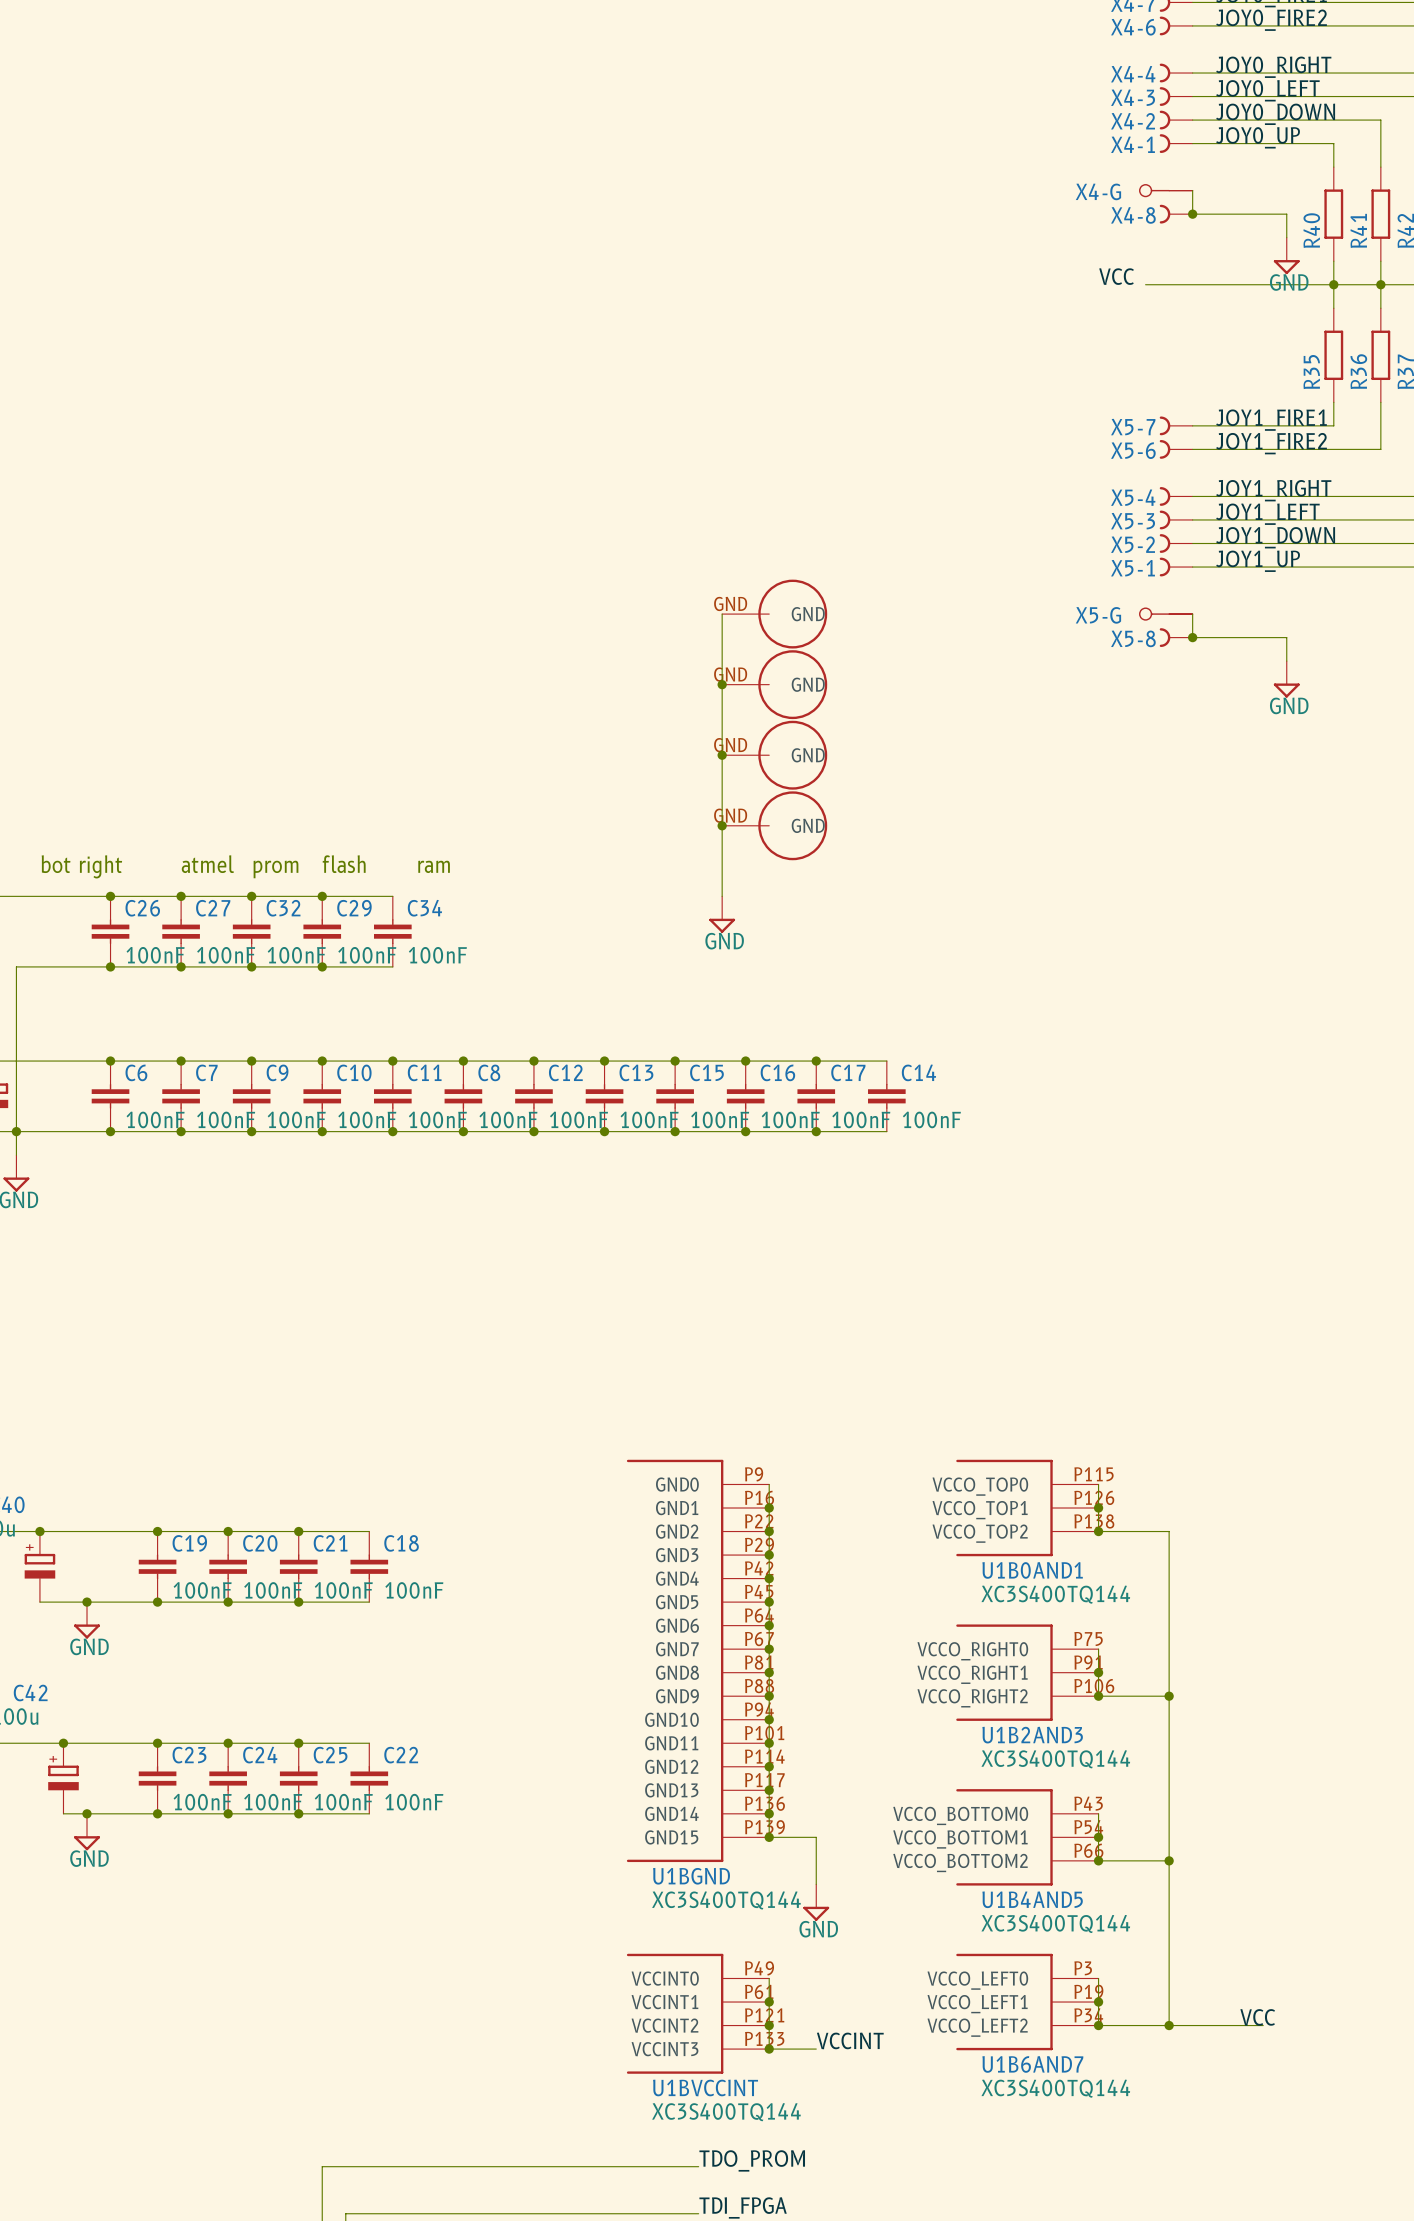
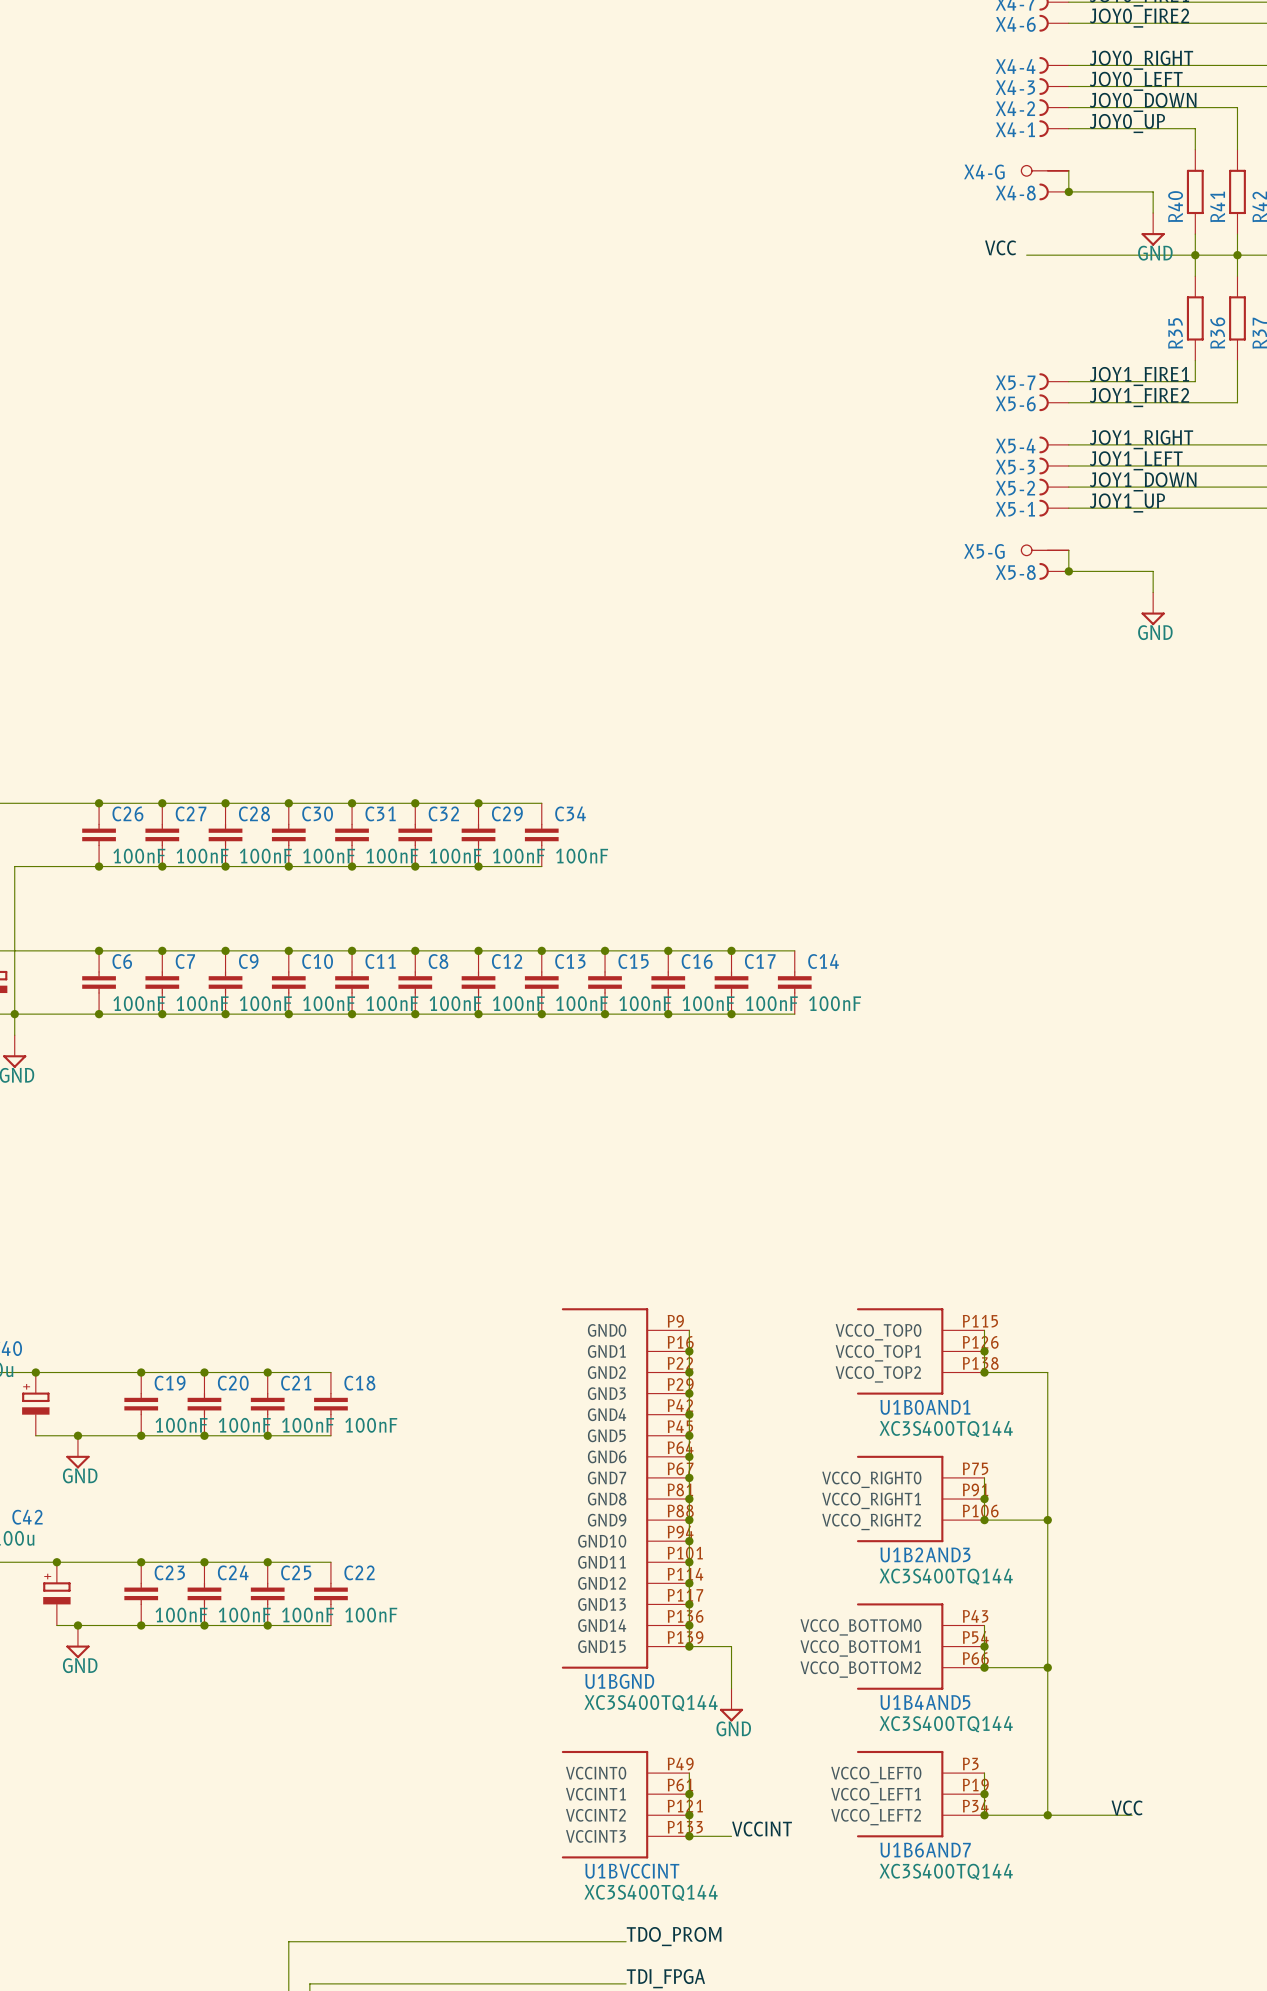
wire: (722, 614) (722, 896) -> none
part: (774, 614) -> none
junction: (722, 684) -> none
part: (774, 684) -> none
junction: (722, 755) -> none
part: (774, 755) -> none
junction: (722, 825) -> none
part: (774, 825) -> none
text: atmel (207, 864) -> none
text: flash (344, 864) -> none
text: bot right (81, 866) -> none
text: ram (434, 866) -> none
text: prom (276, 869) -> none
wire: none -> (352, 803) (541, 803)
junction: none -> (352, 803)
junction: none -> (415, 803)
junction: none -> (478, 803)
C32 name: C32 (283, 908) -> C28 (254, 813)
C29 name: C29 (354, 908) -> C30 (317, 813)
C34 name: C34 (424, 908) -> C31 (380, 813)
power symbol: GND (722, 914) -> none
C32: none -> 100nF (415, 834)
C29: none -> 100nF (478, 834)
C34: none -> 100nF (541, 834)
wire: none -> (352, 866) (541, 866)
junction: none -> (352, 866)
junction: none -> (415, 866)
junction: none -> (478, 866)

